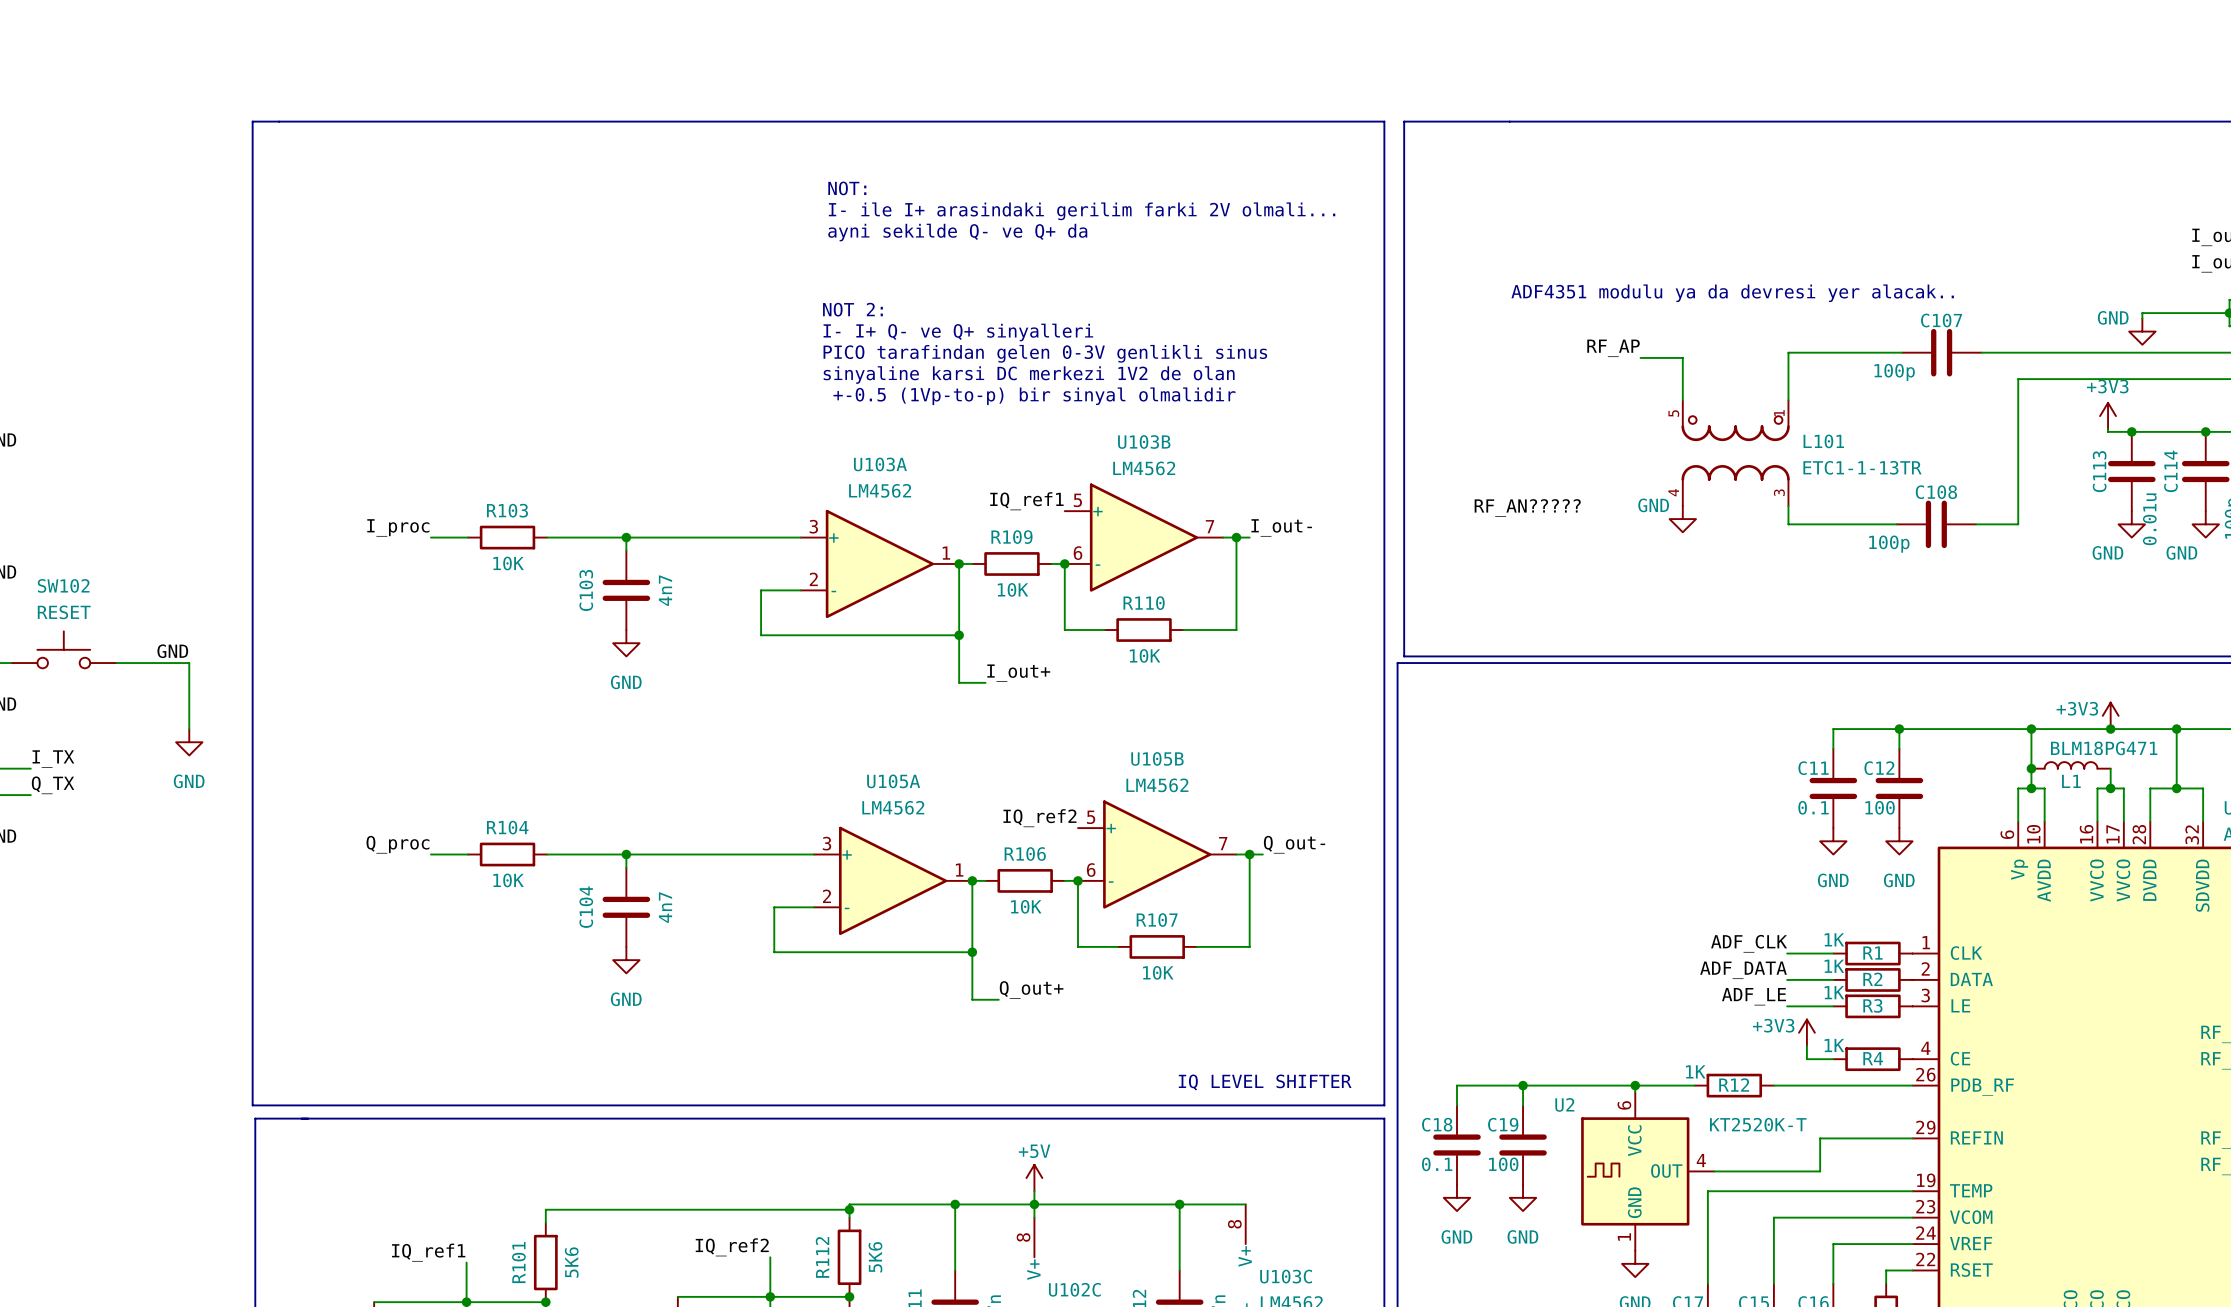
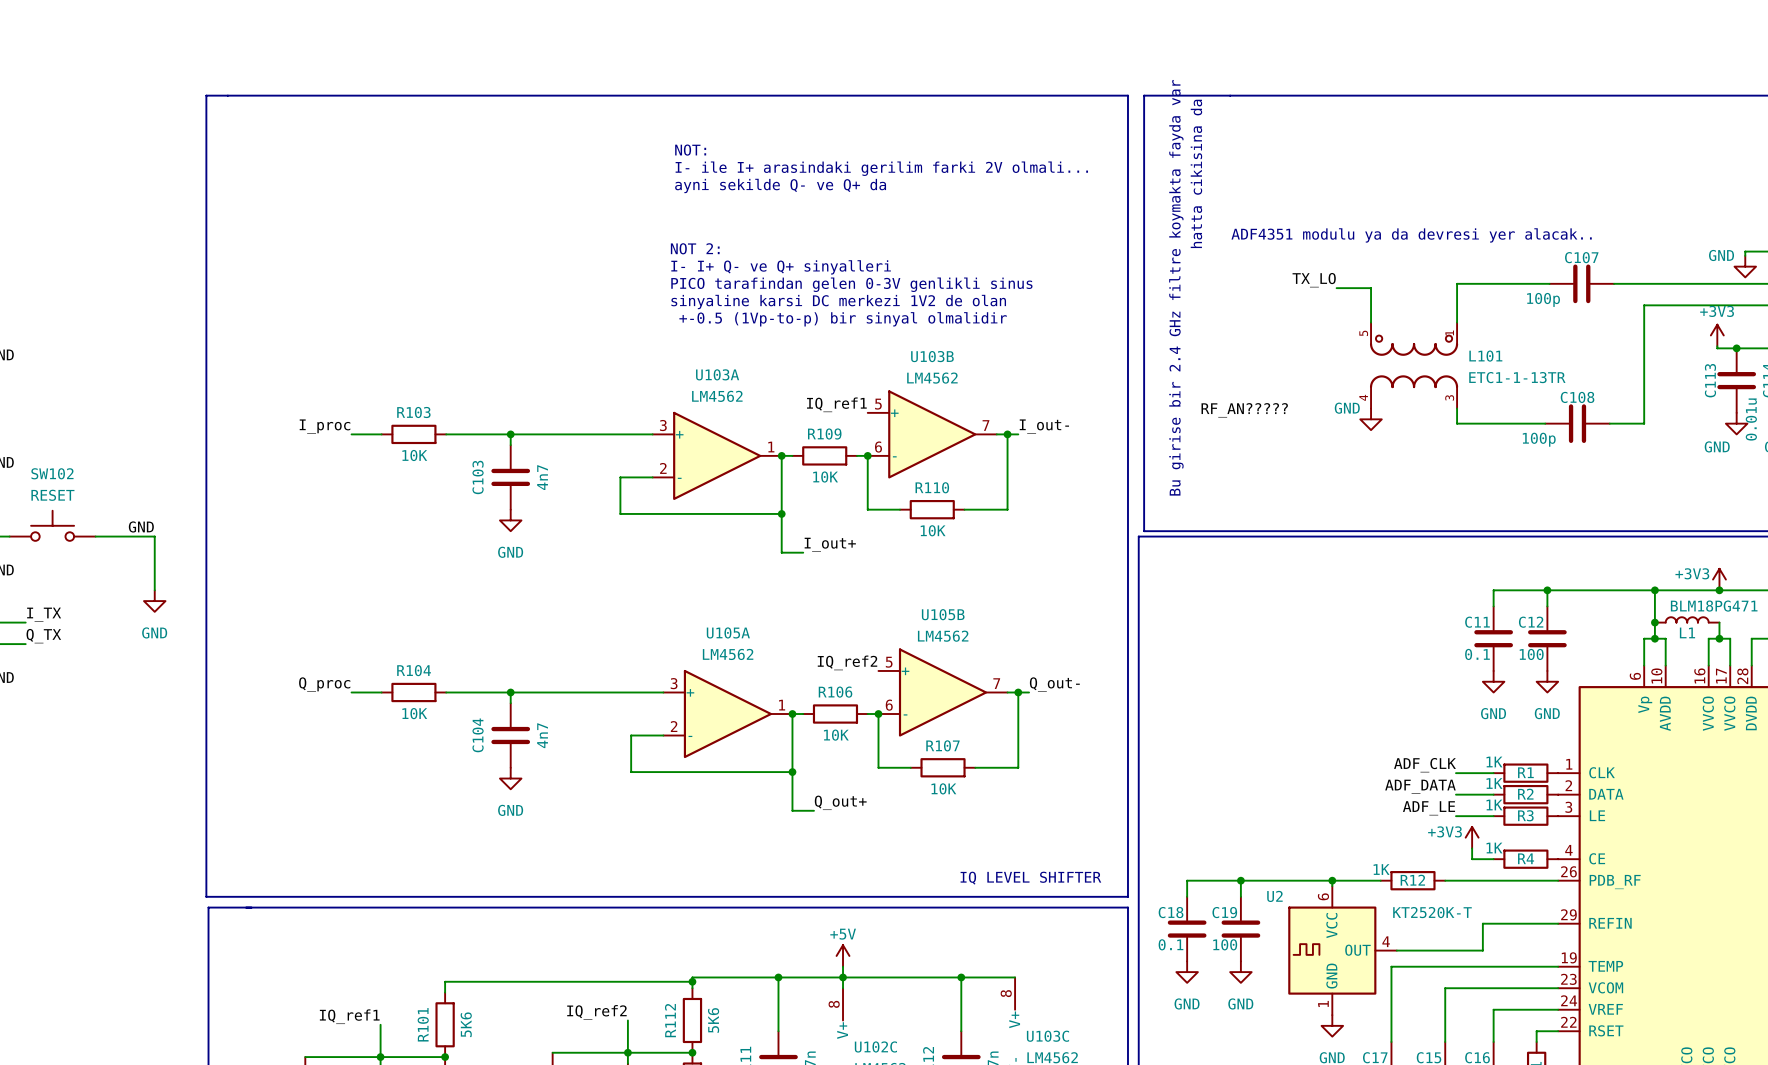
text: none -> hatta cikisina da (1196, 173)
label: RF_AP (1613, 348) -> TX_LO (1314, 280)
text: none -> Bu girise bir 2.4 GHz filtre koymakta fayda var (1176, 287)

